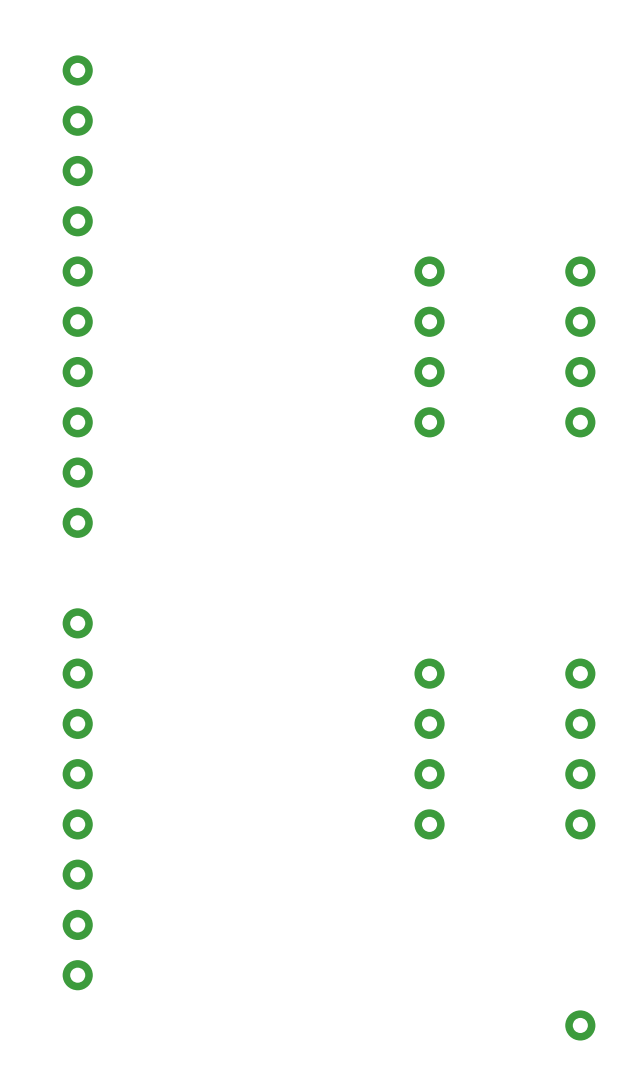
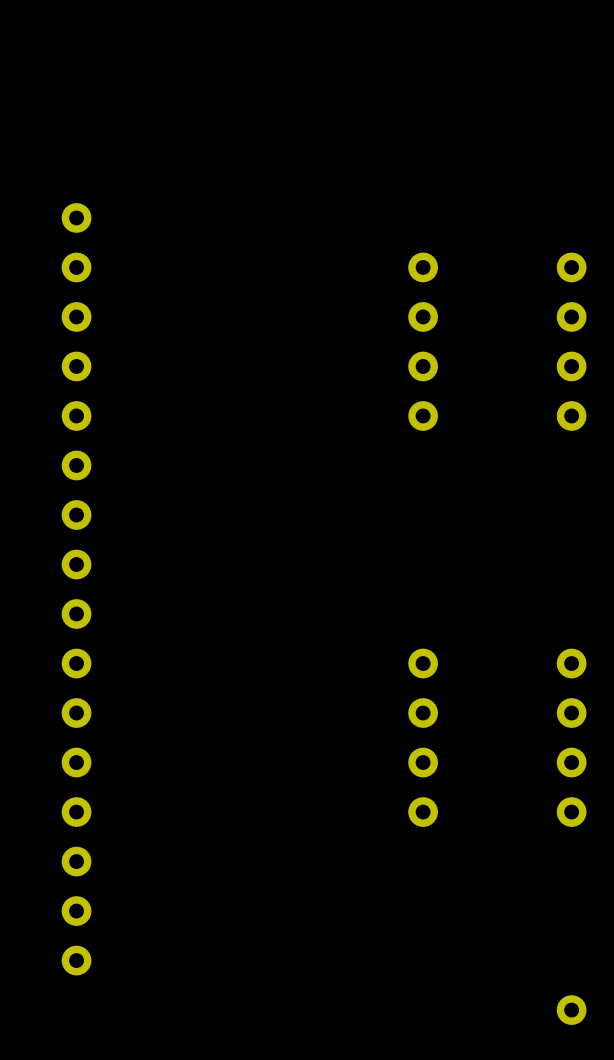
part: (77, 296) -> none
part: none -> (76, 391)

